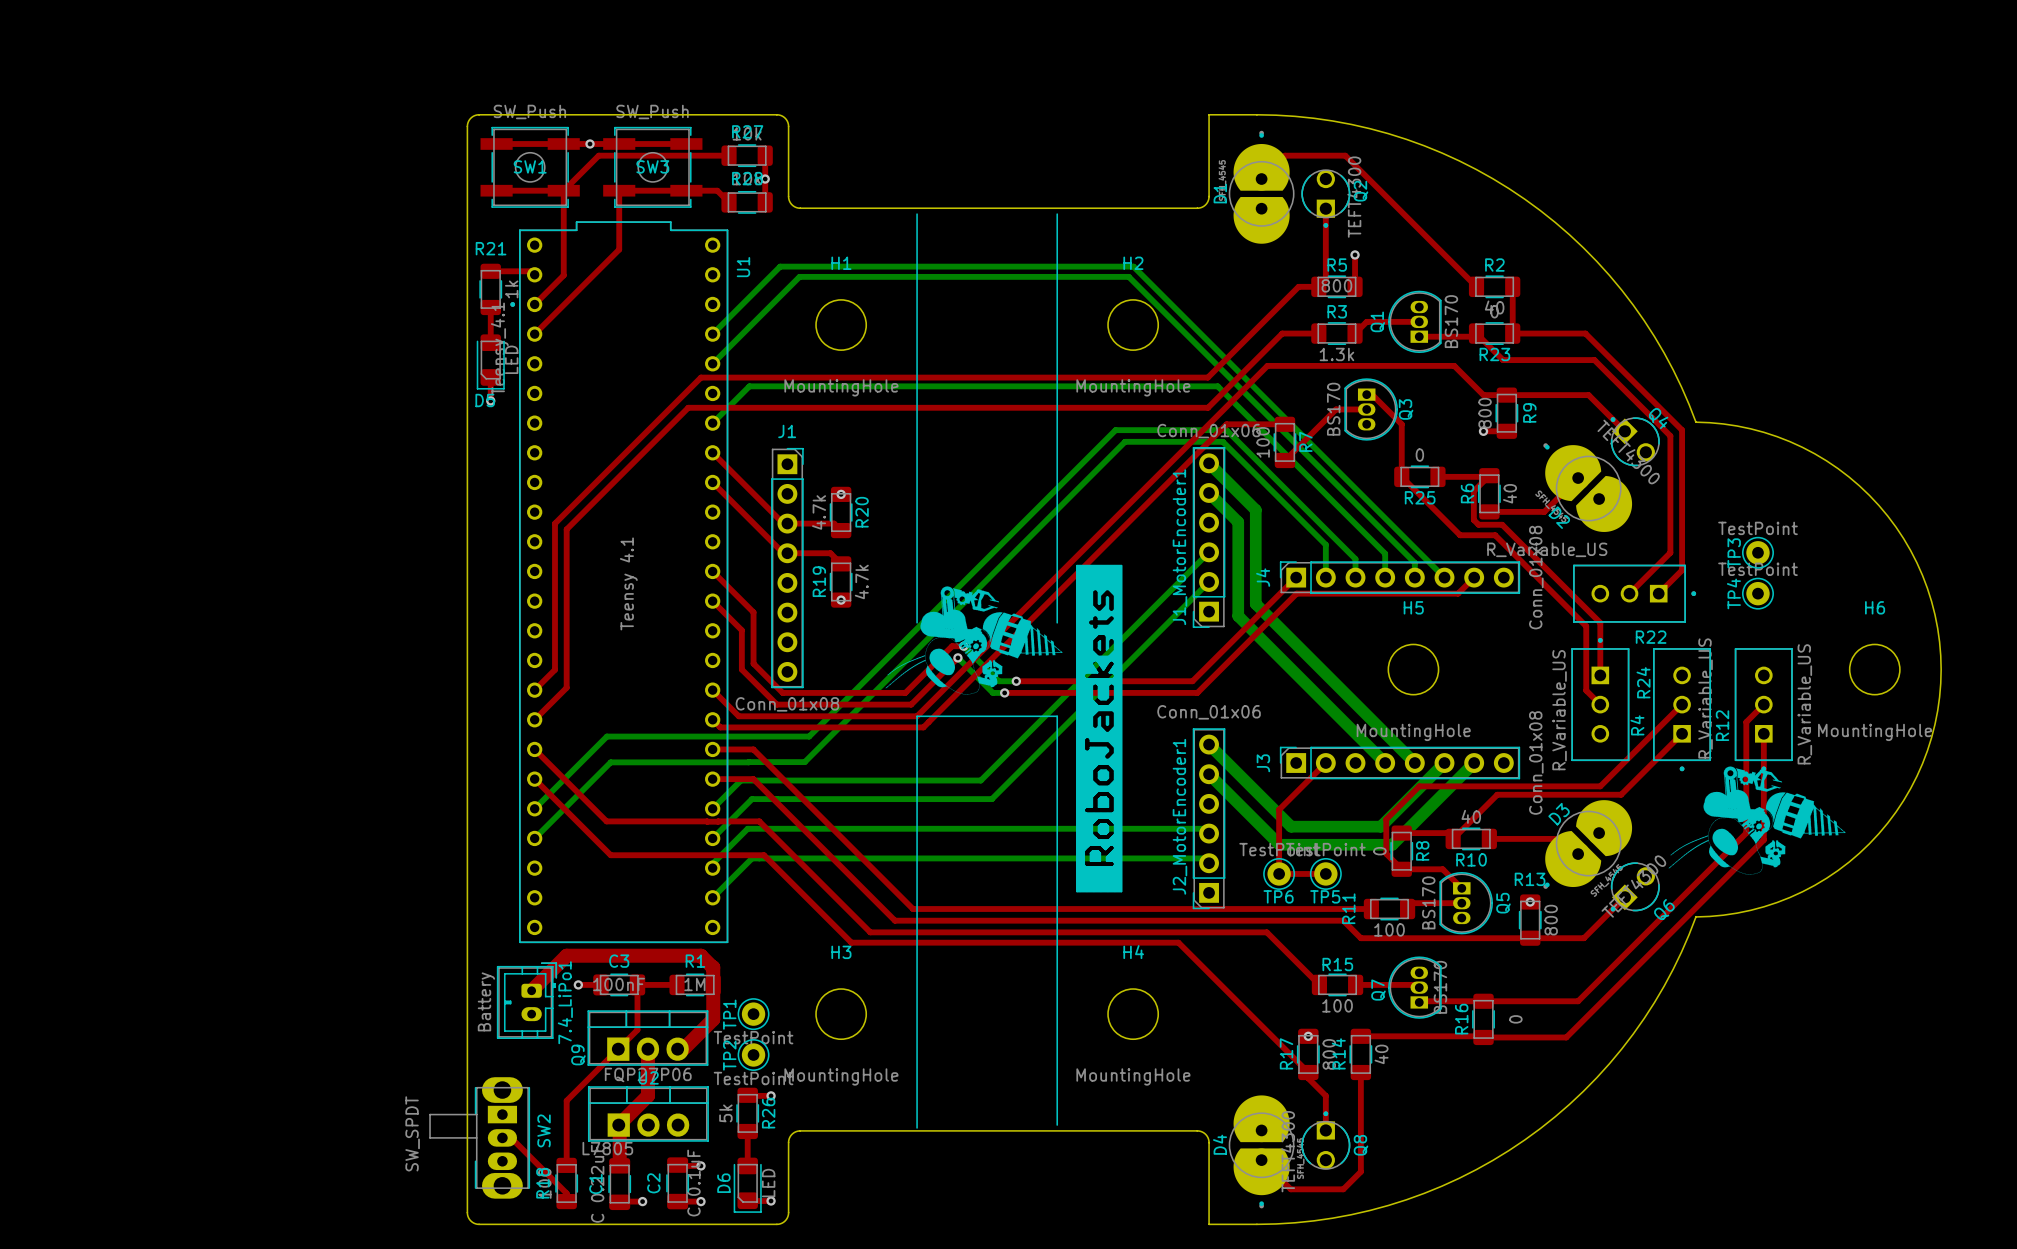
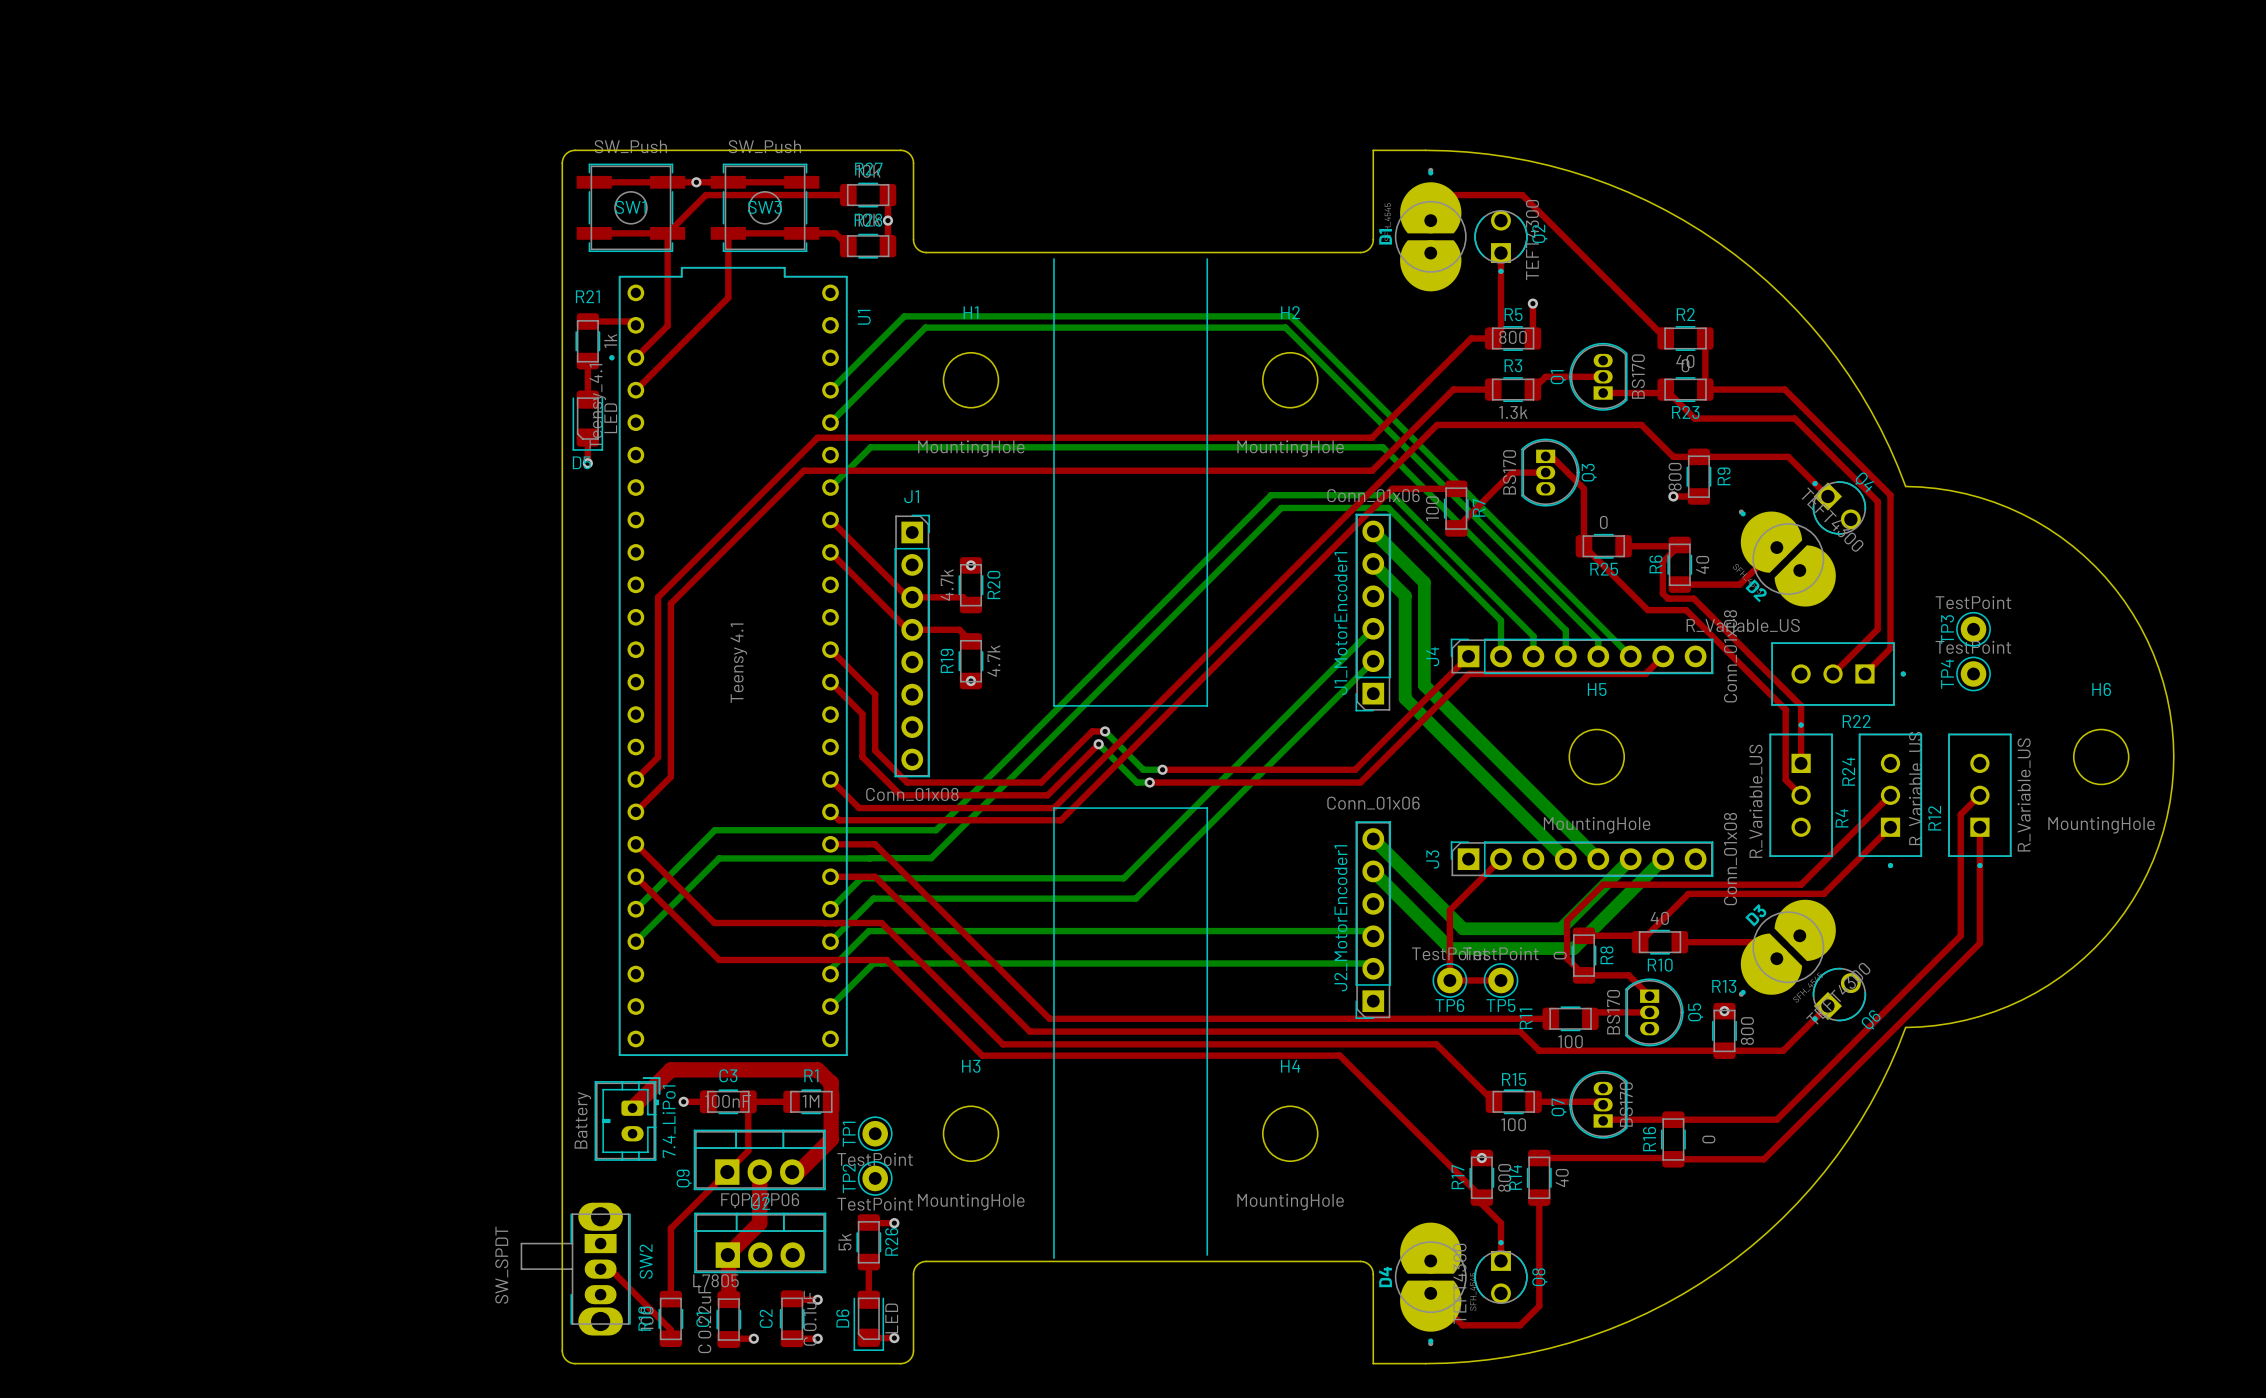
drawing: [885, 565, 1123, 893] -> none
line: none -> (1053, 705) (1207, 705)
drawing: [1668, 766, 1846, 875] -> none

